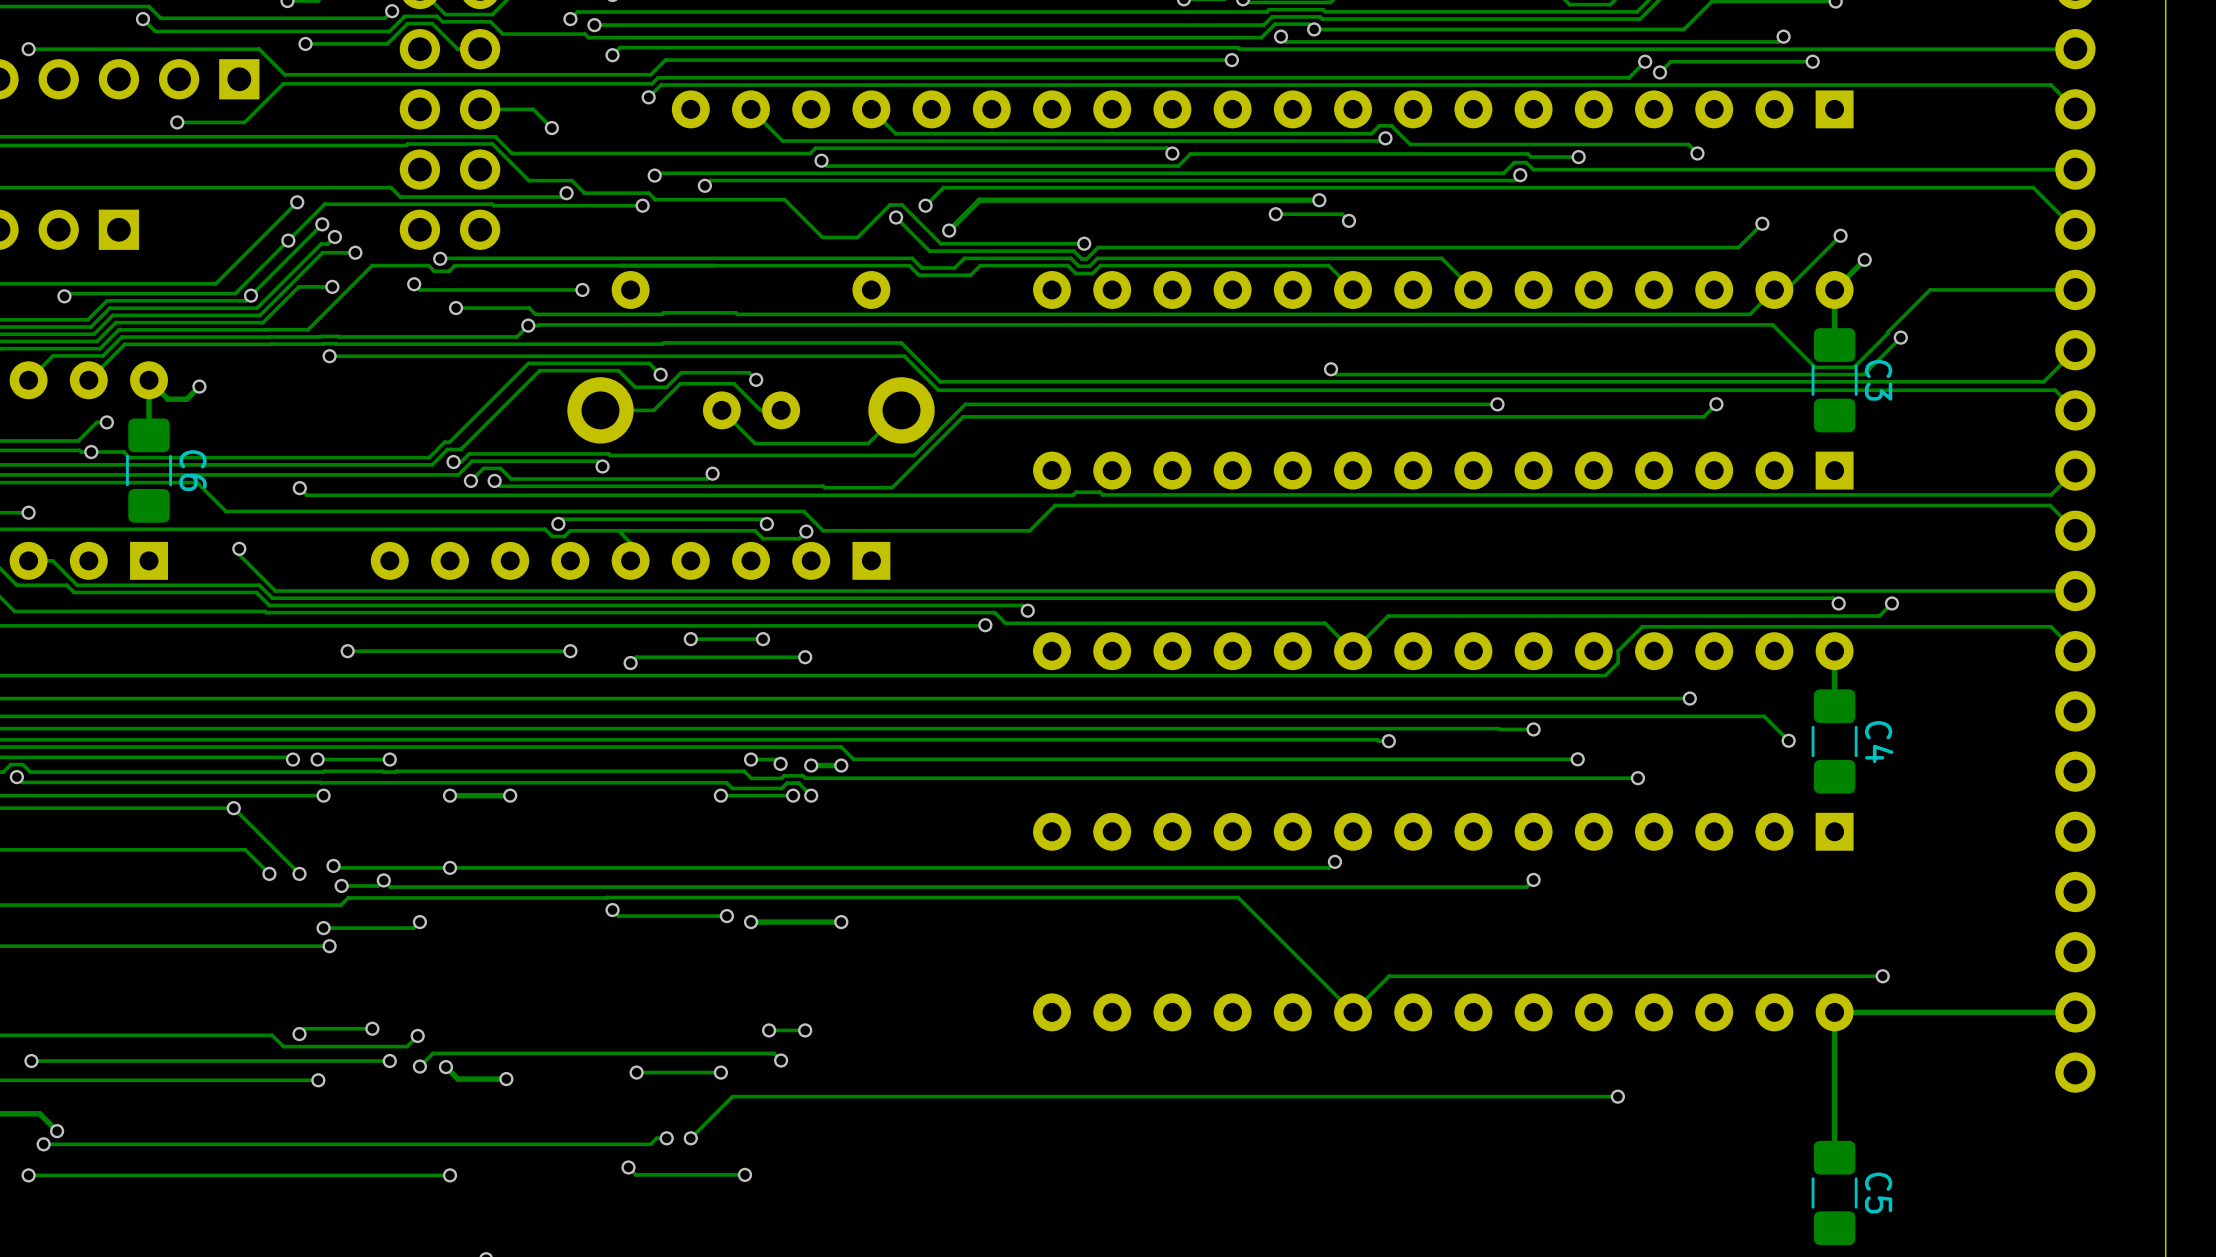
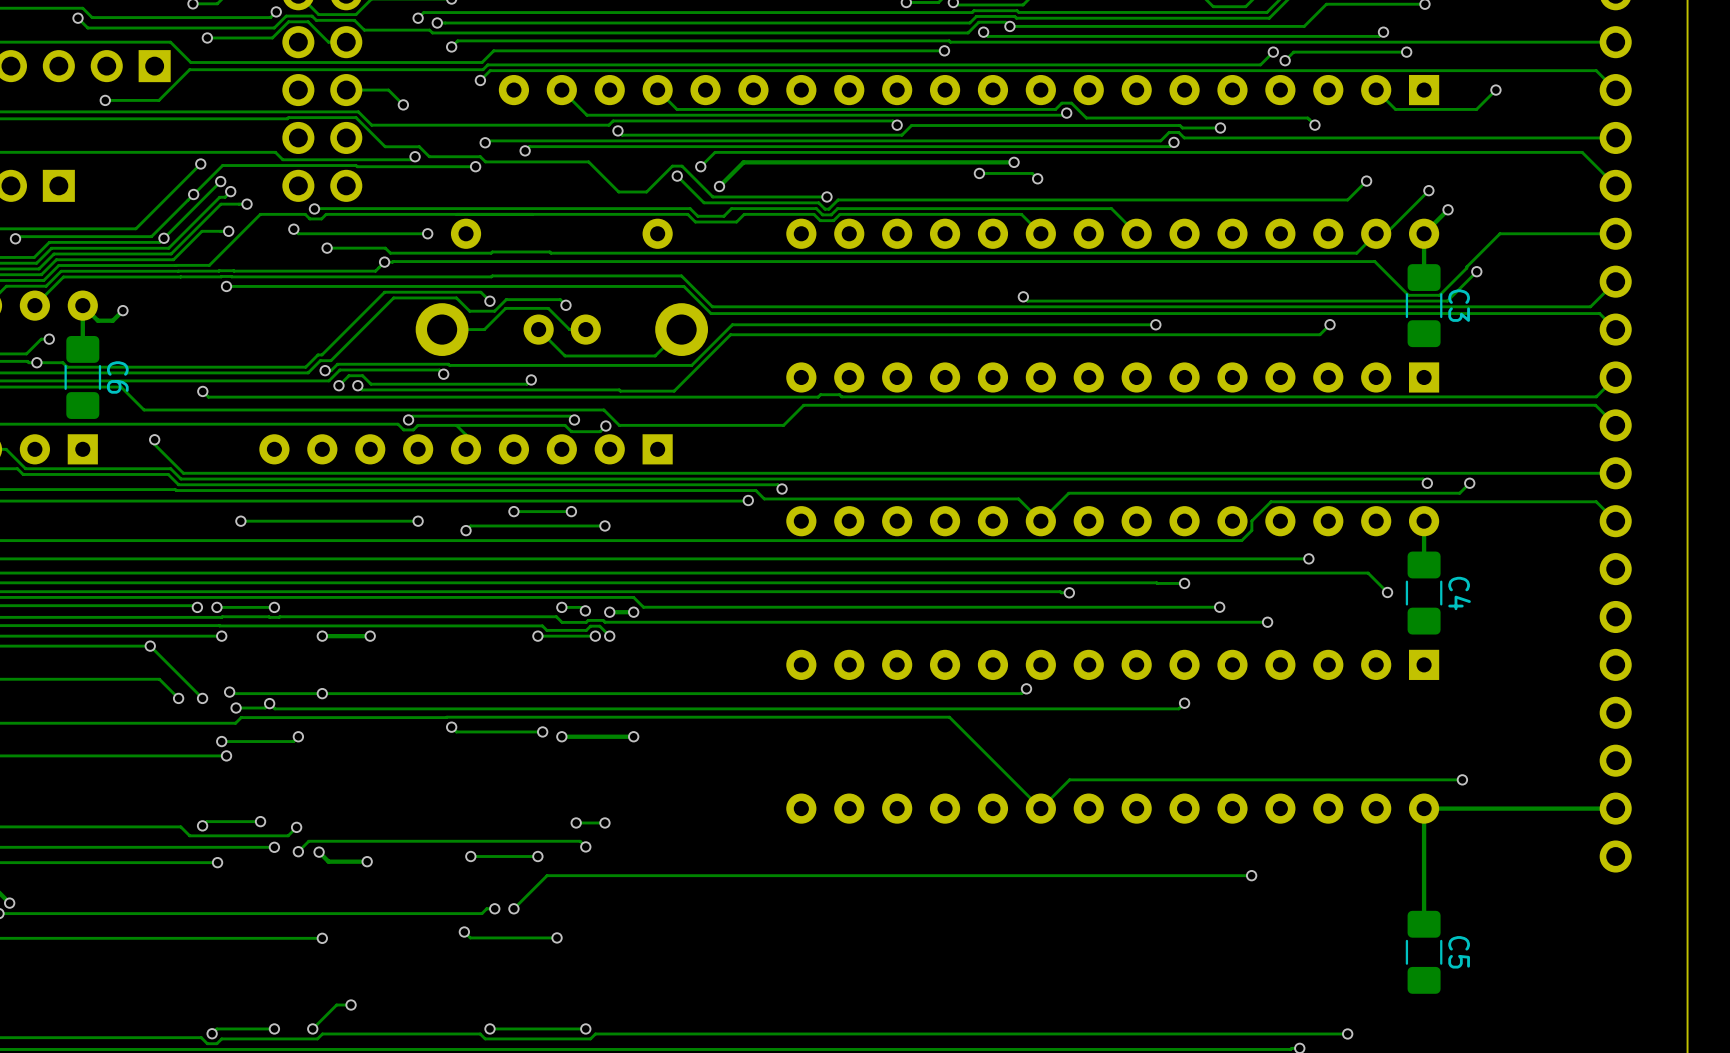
track: none -> (1495, 90) (1476, 109) (1395, 109) (1376, 90)
via: none -> (1495, 90)

